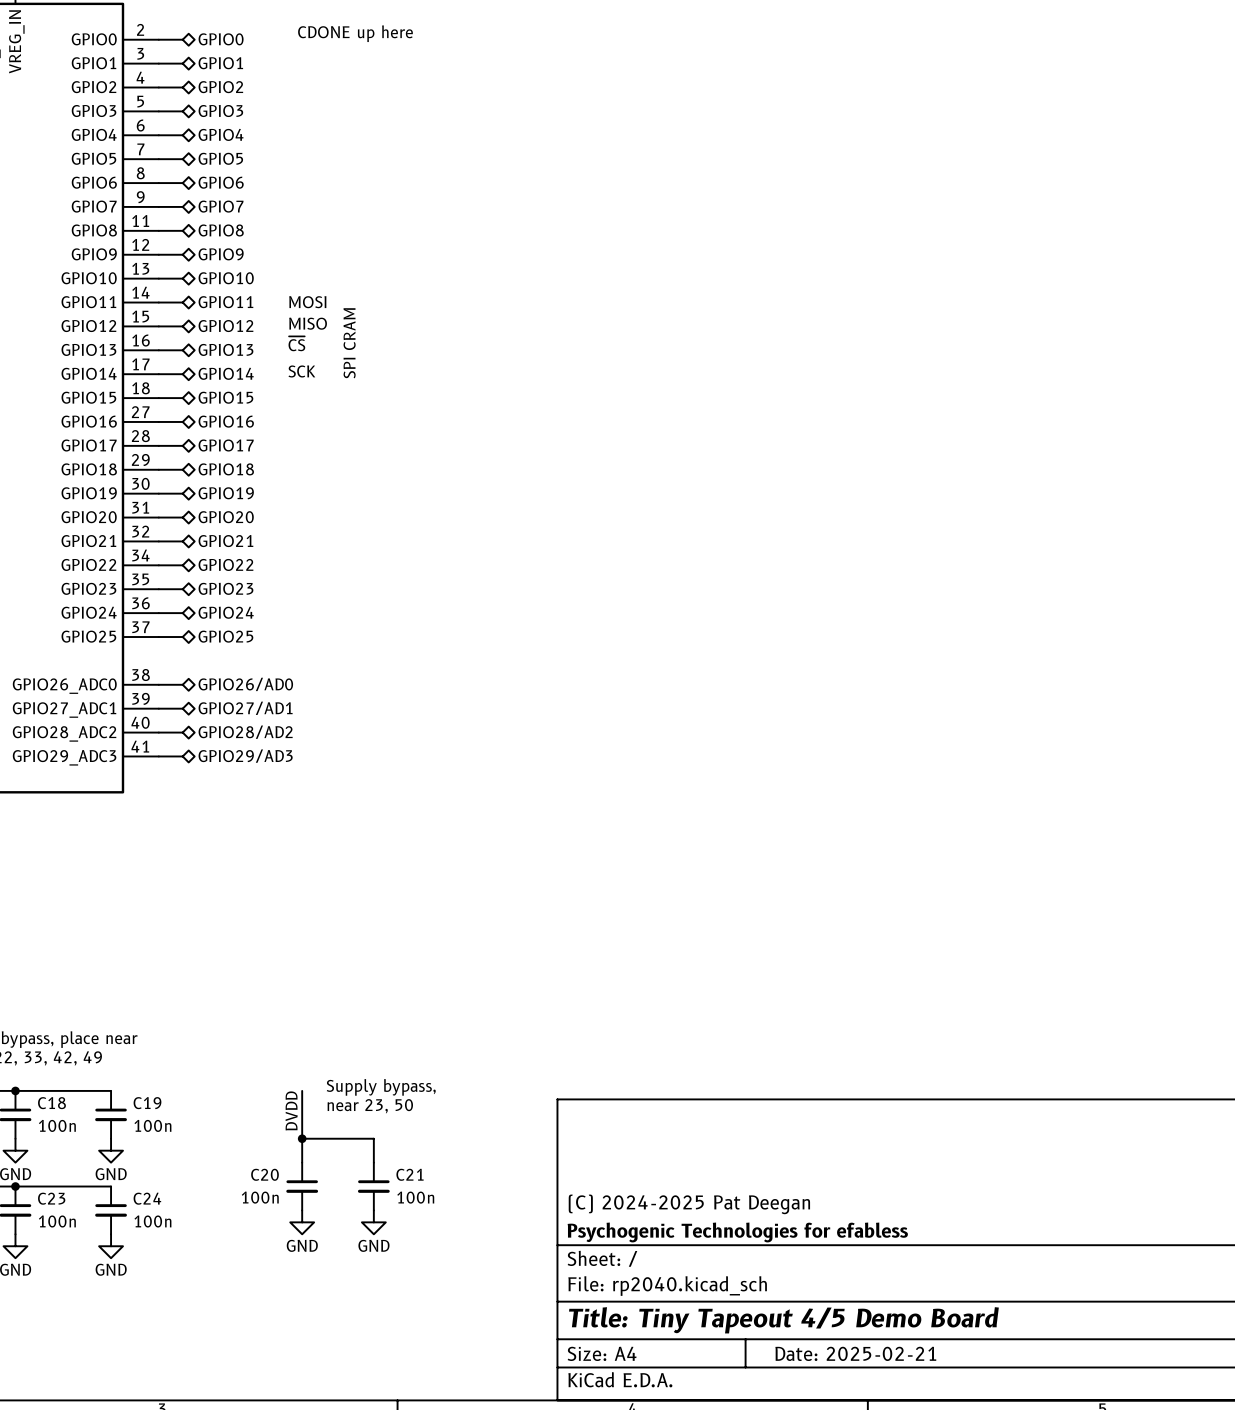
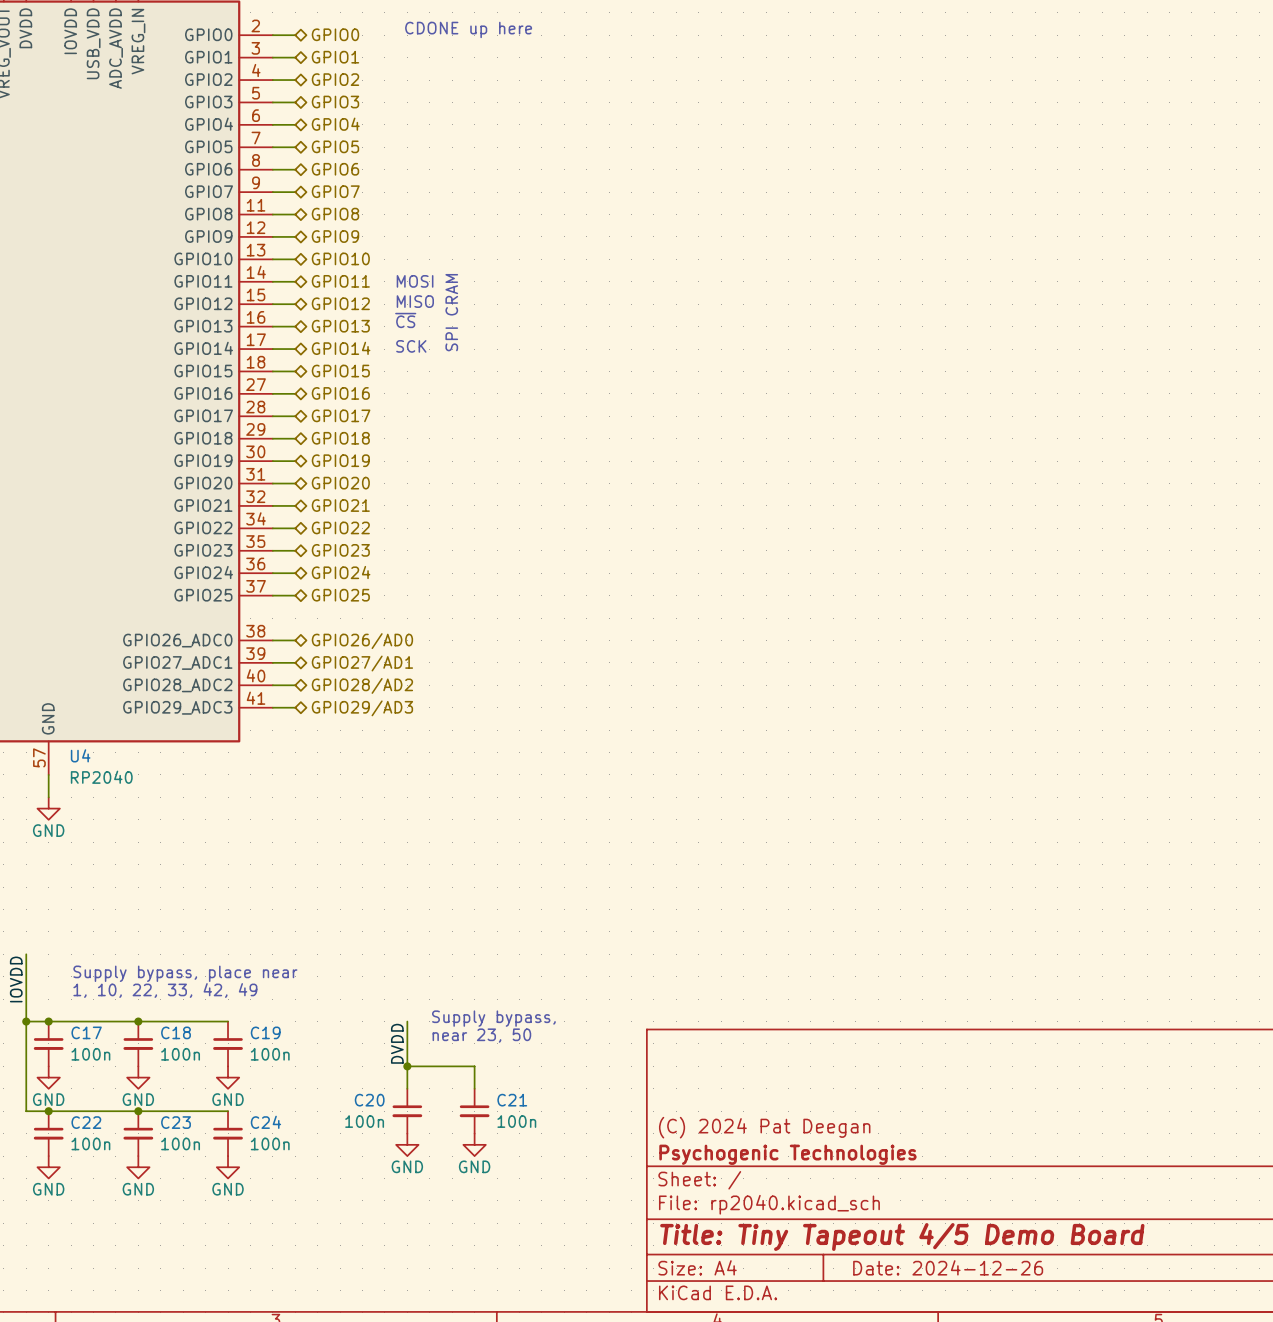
title block: (C) 2024-2025 Pat Deegan (689, 1204) -> (C) 2024 Pat Deegan (764, 1127)
title block: Psychogenic Technologies for efabless (737, 1232) -> Psychogenic Technologies (787, 1154)
title block: Date: 2025-02-21 (855, 1353) -> Date: 2024-12-26 (948, 1267)

